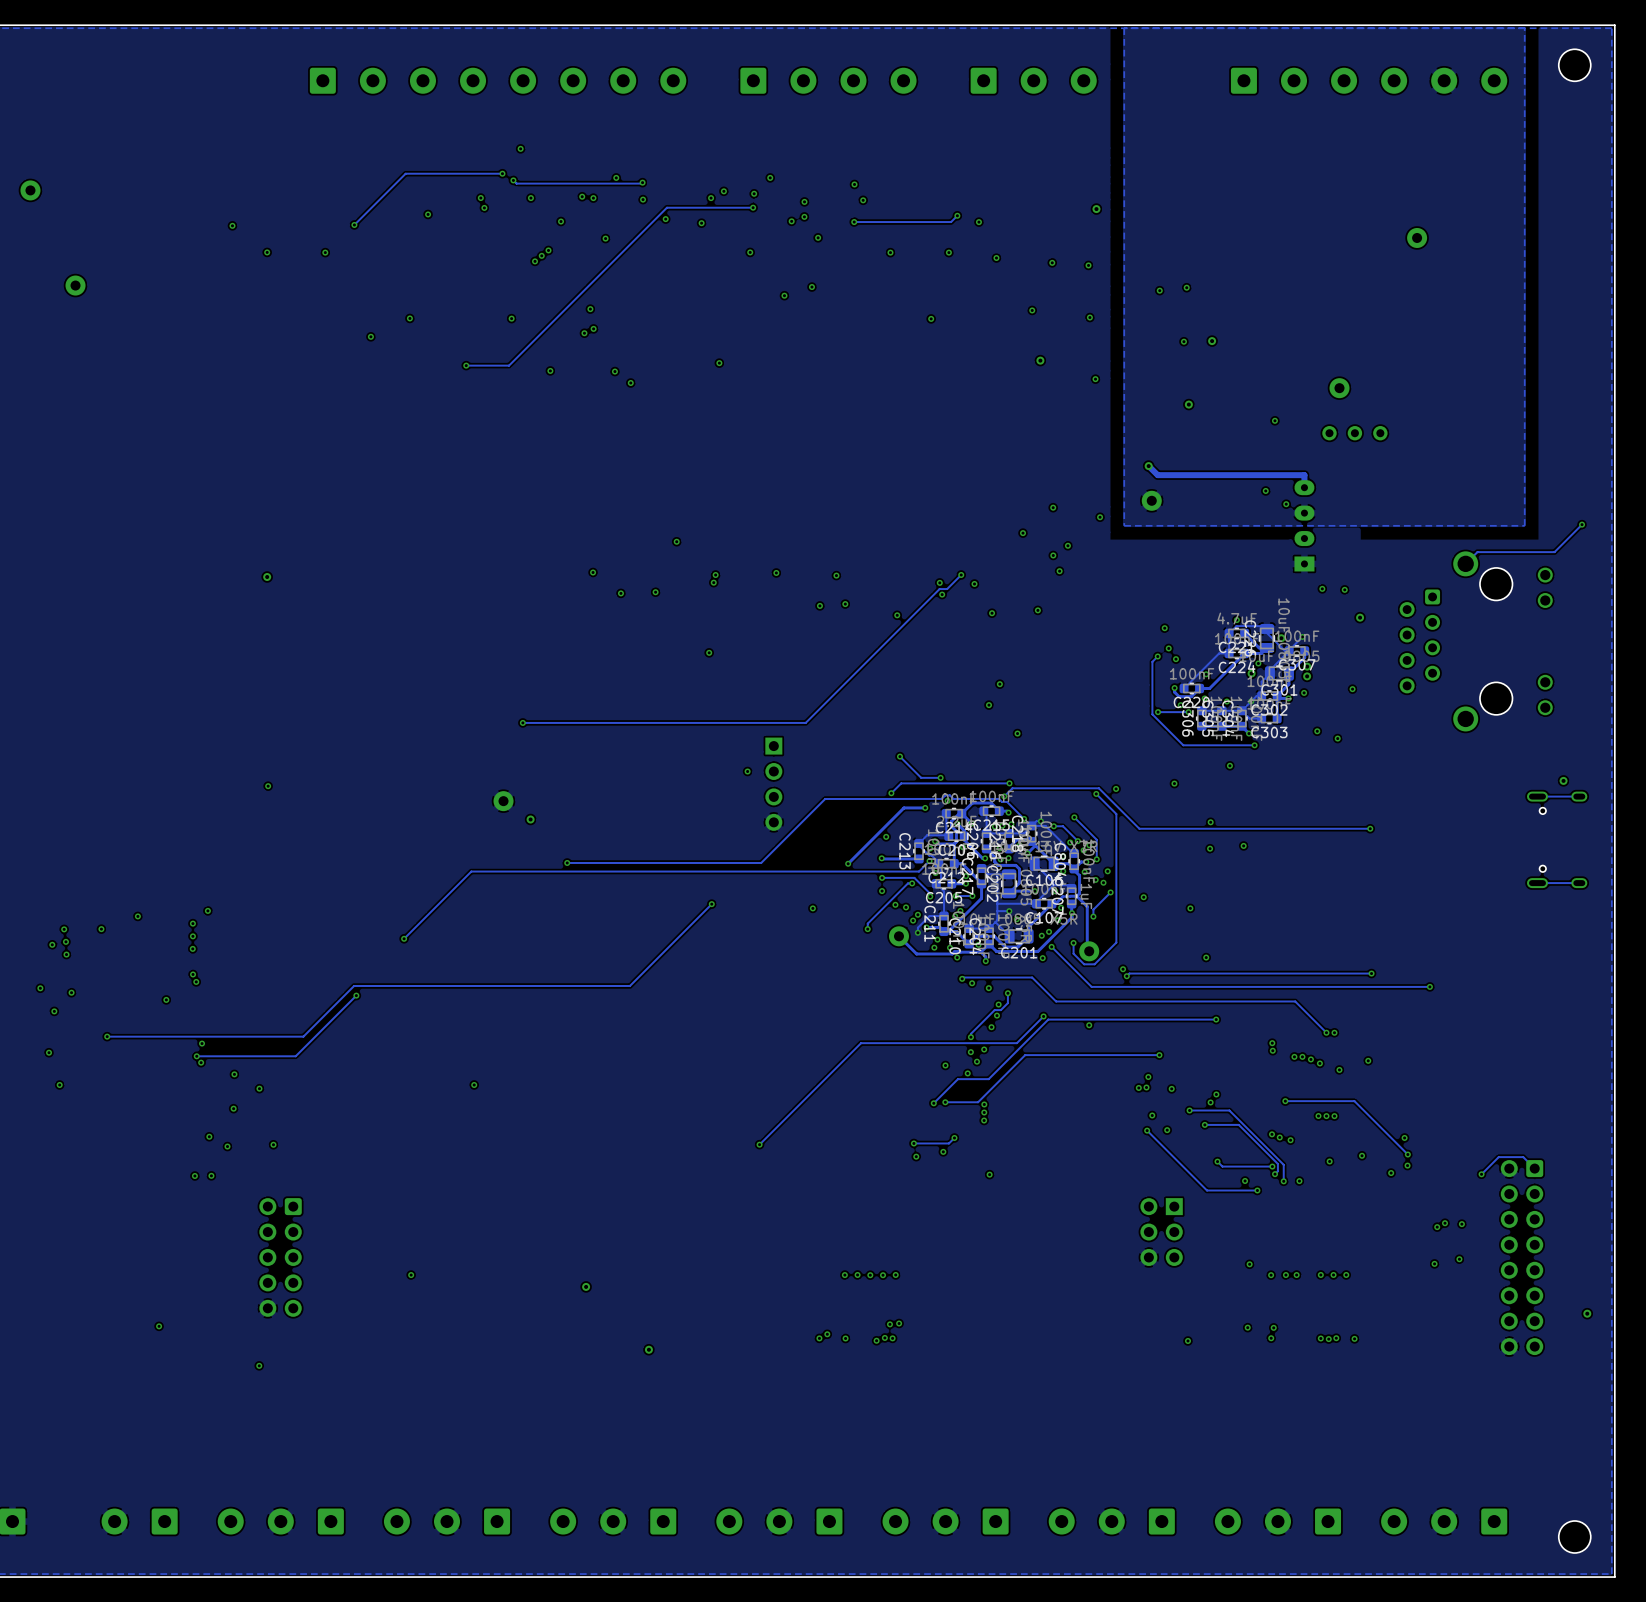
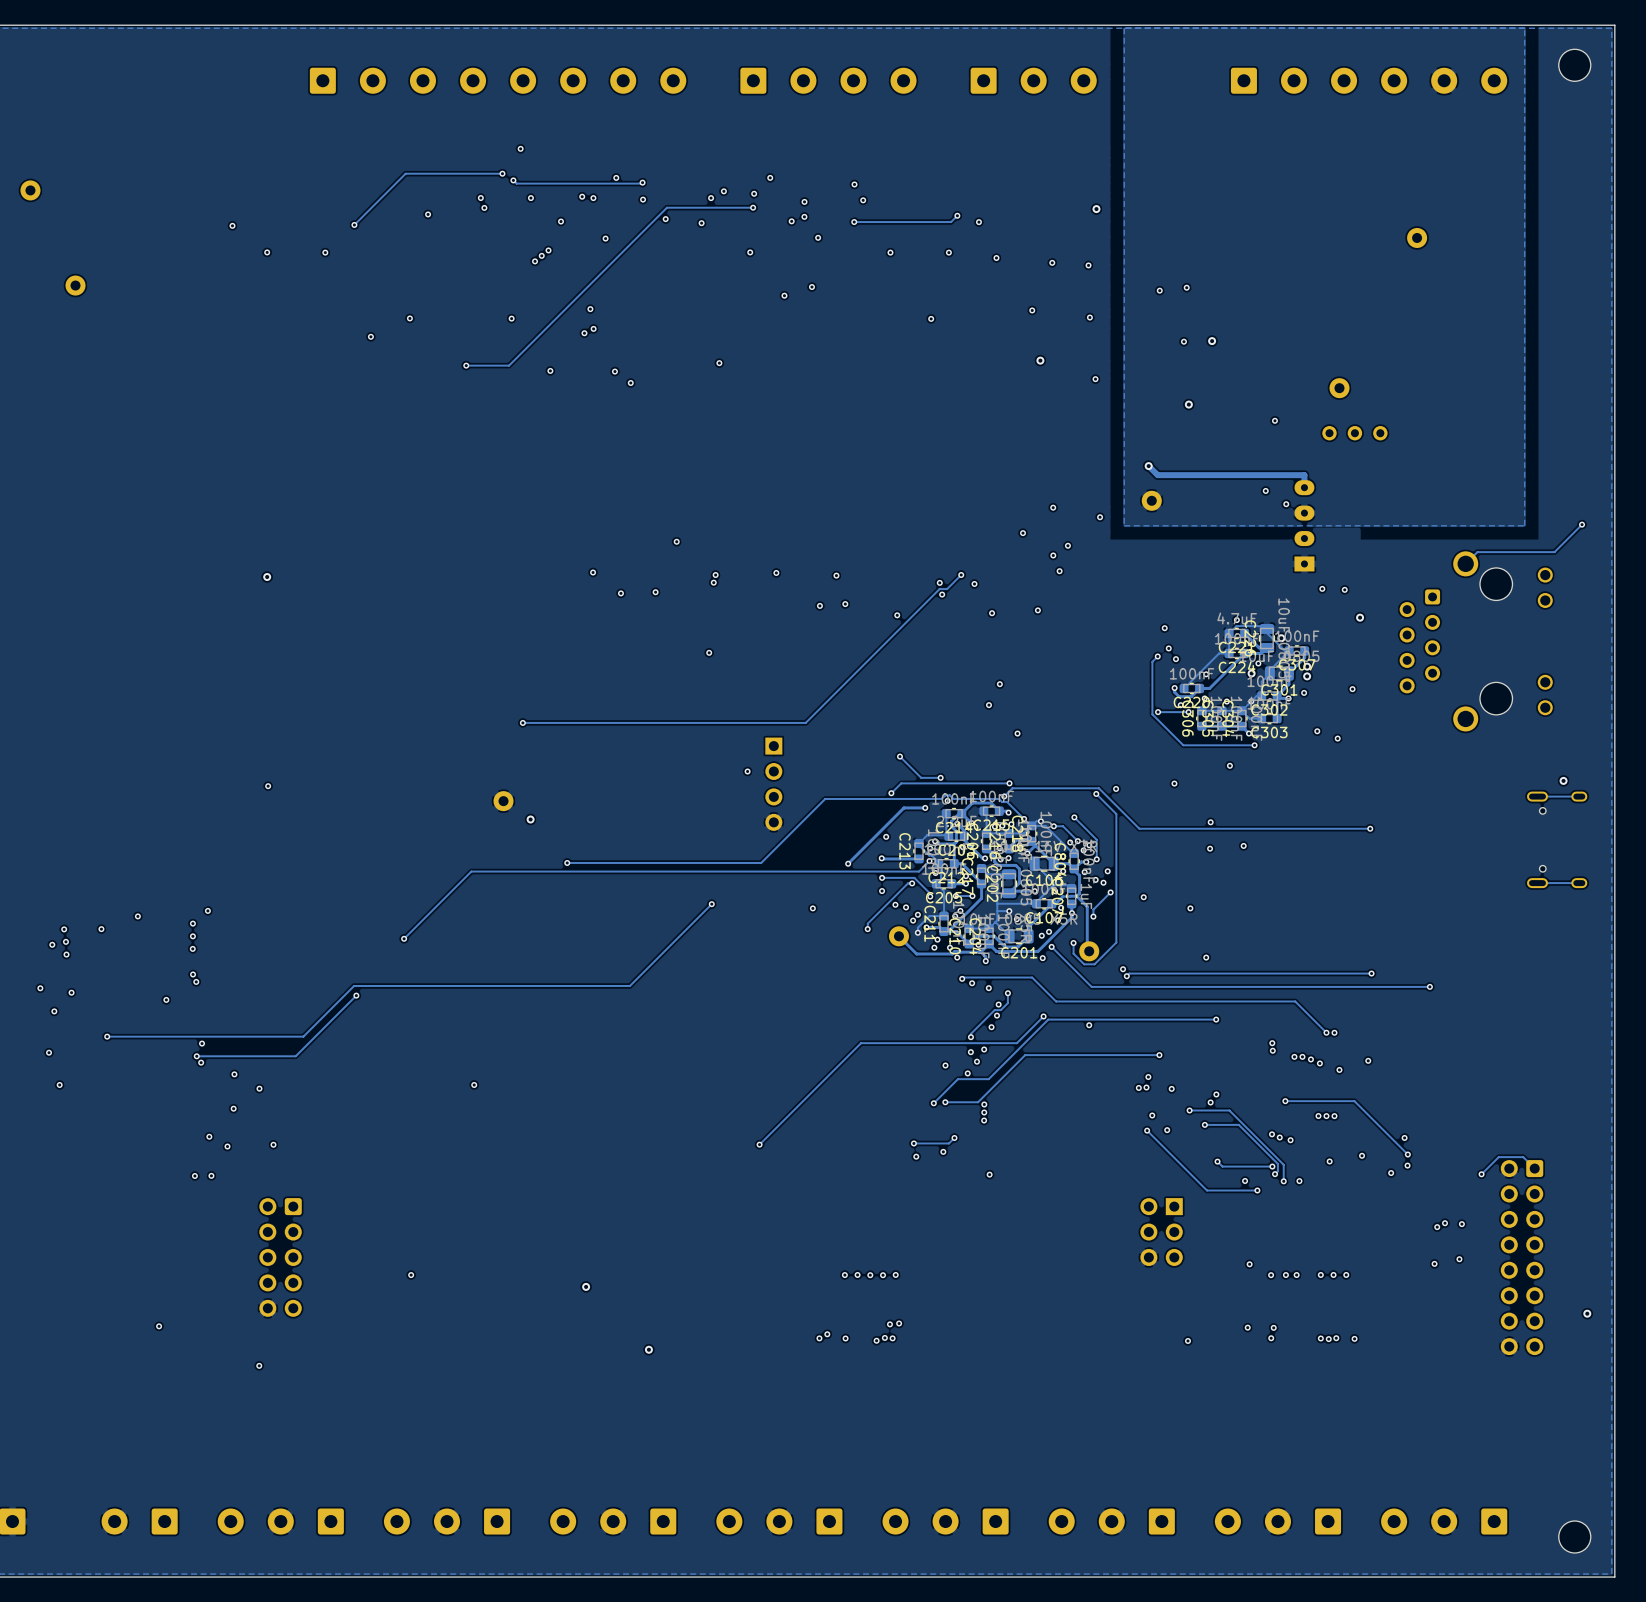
track: (1302, 636) (1292, 646) -> none
via: (1302, 636) -> none

